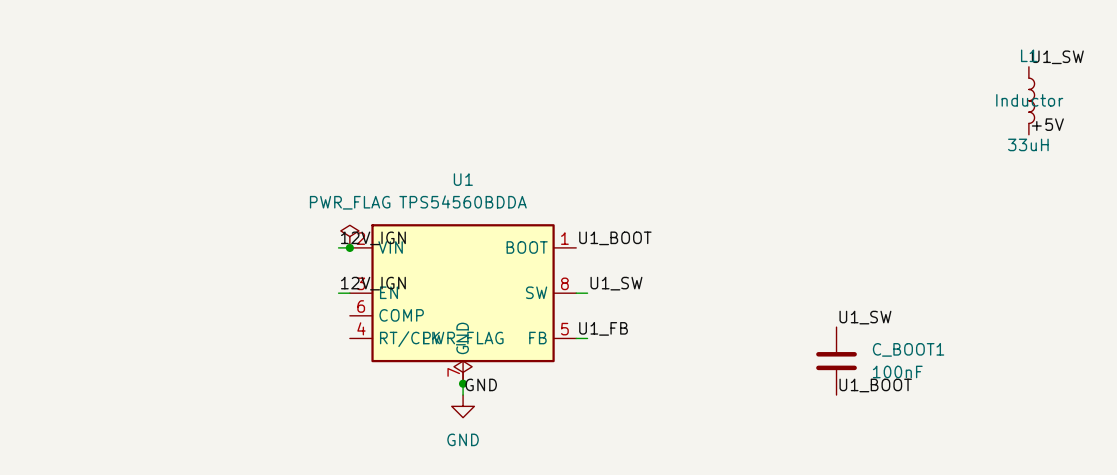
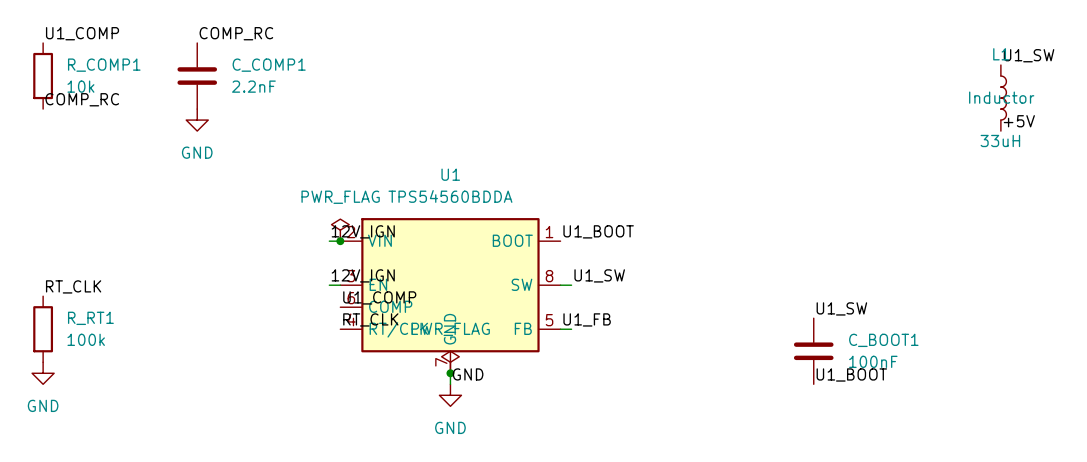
label: none -> U1_COMP (82, 33)
label: none -> COMP_RC (236, 33)
R_COMP1: none -> 10k (43, 76)
C_COMP1: none -> 2.2nF (197, 76)
label: none -> COMP_RC (82, 99)
power symbol: none -> GND (197, 120)
label: none -> RT_CLK (73, 286)
label: none -> U1_COMP (379, 297)
label: none -> RT_CLK (370, 319)
R_RT1: none -> 100k (43, 329)
power symbol: none -> GND (43, 373)

